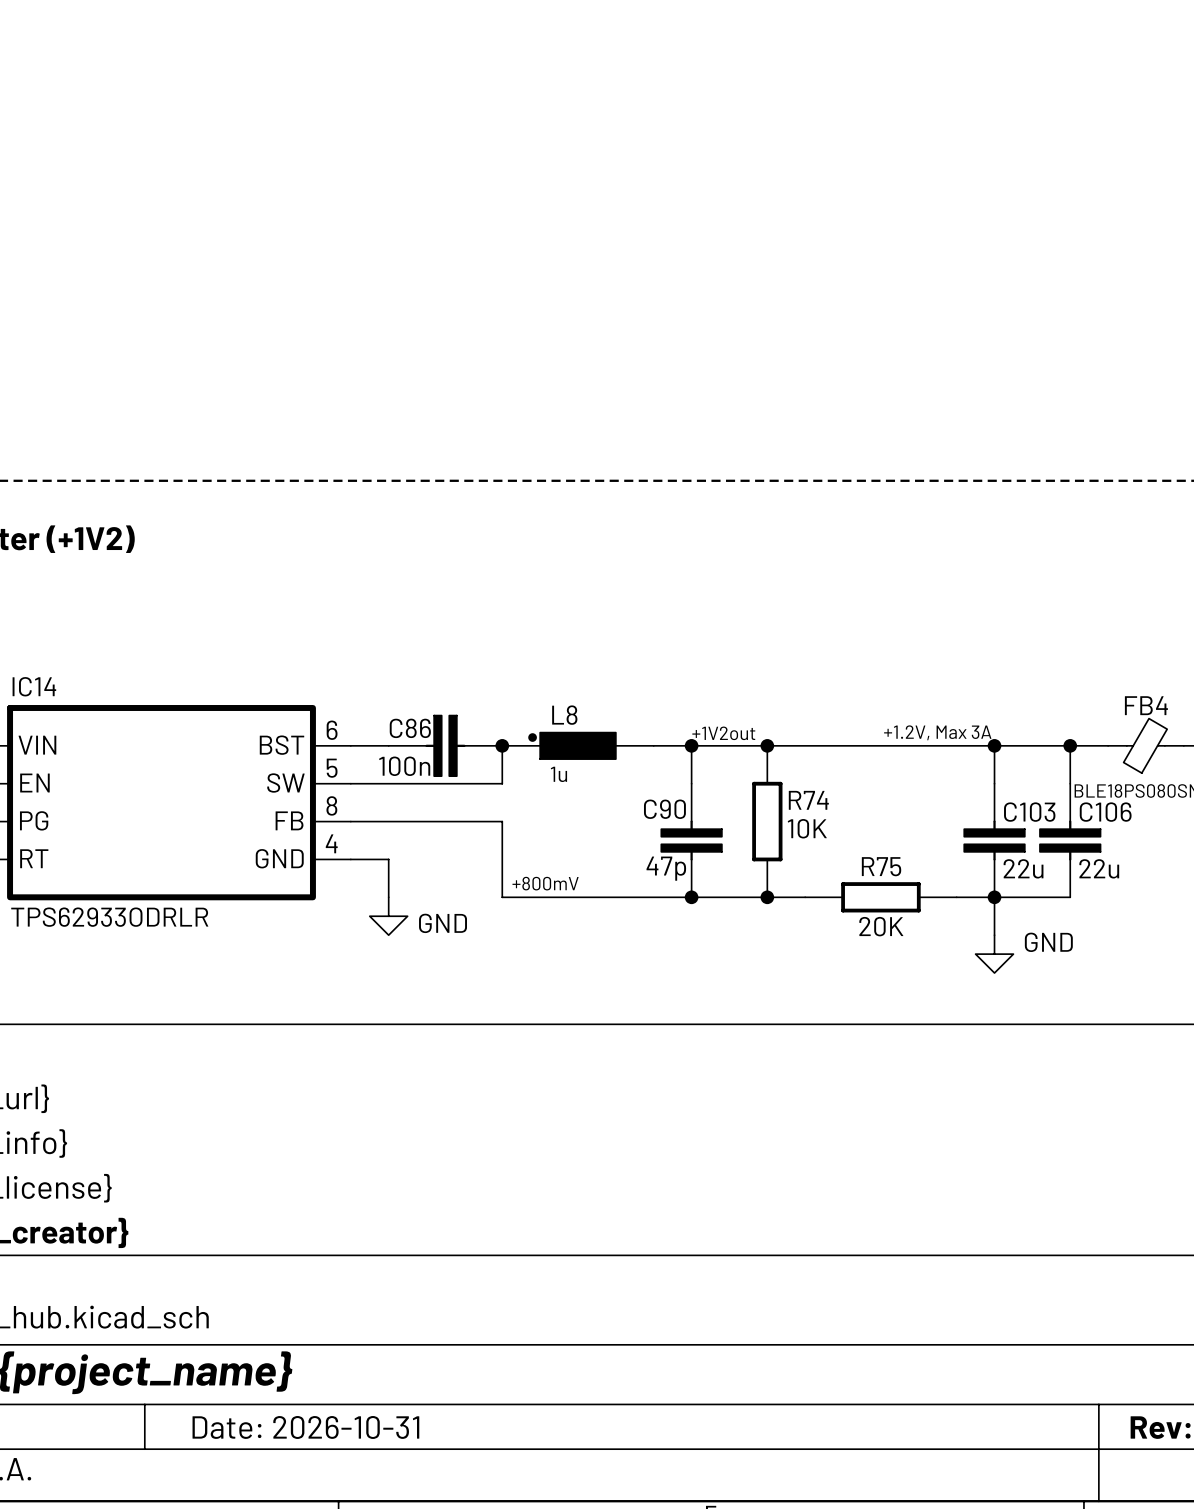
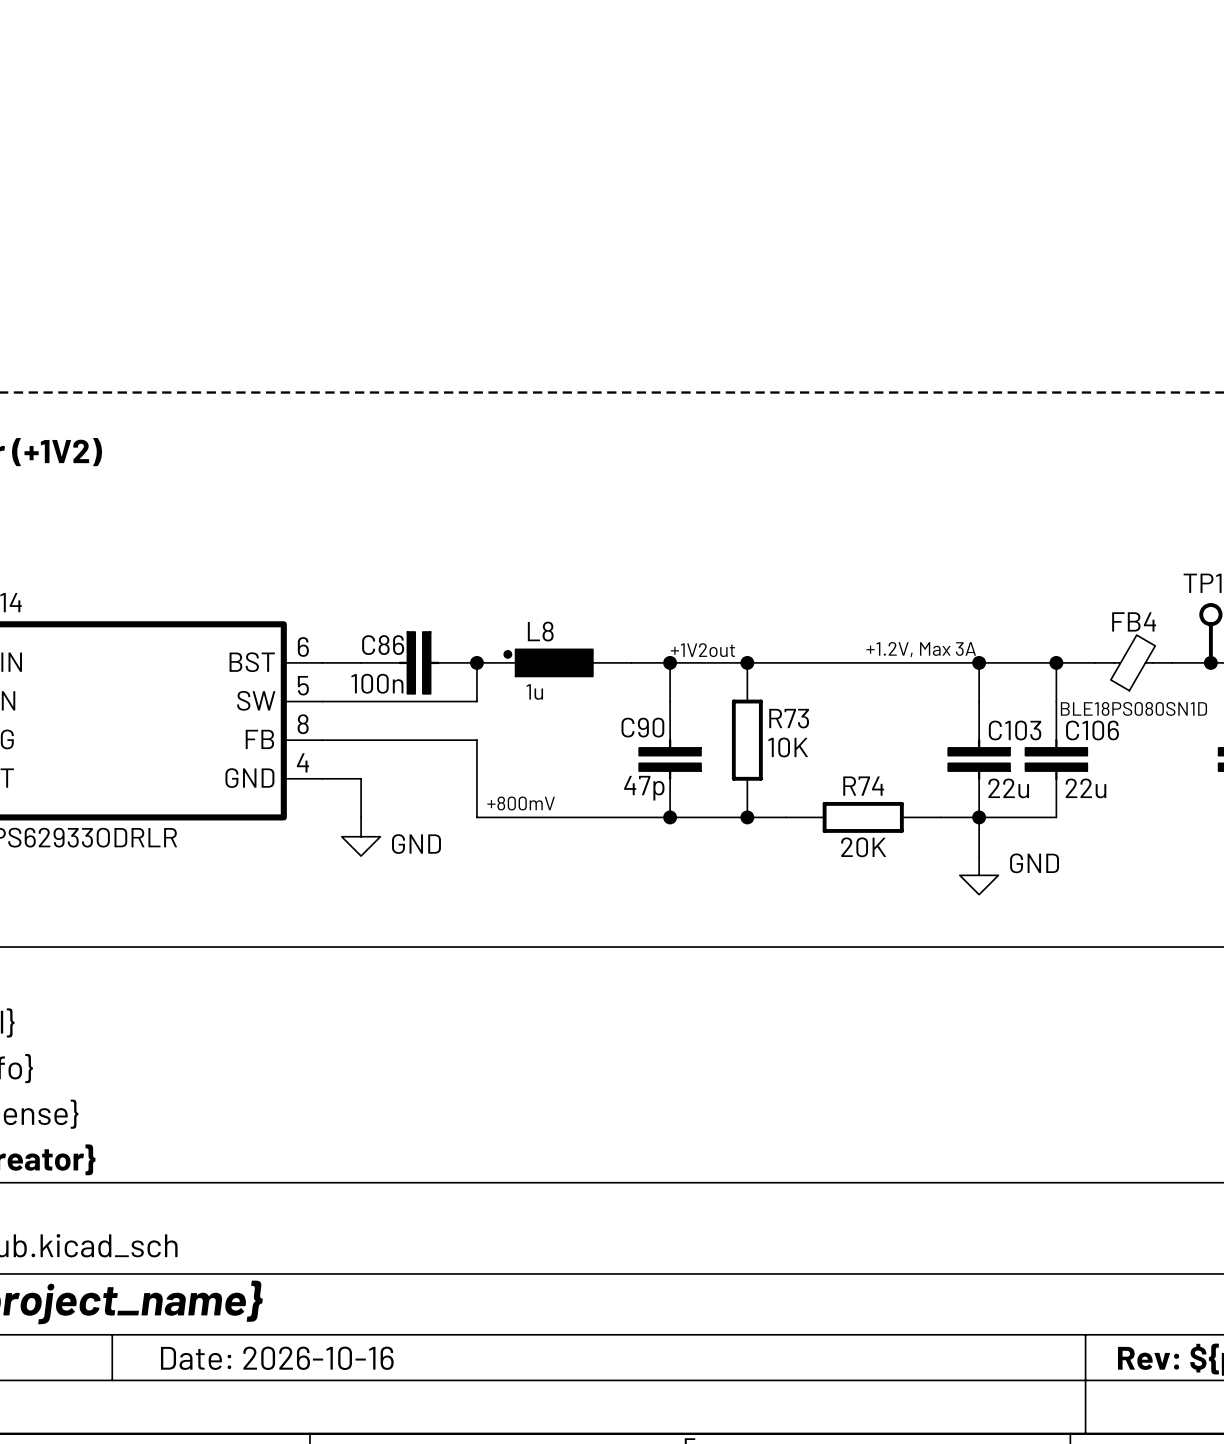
R74 name: R74 (808, 800) -> R73 (789, 718)
R75 name: R75 (881, 866) -> R74 (863, 786)
title block: Date: 2026-10-31 (305, 1427) -> Date: 2026-10-16 (277, 1358)

